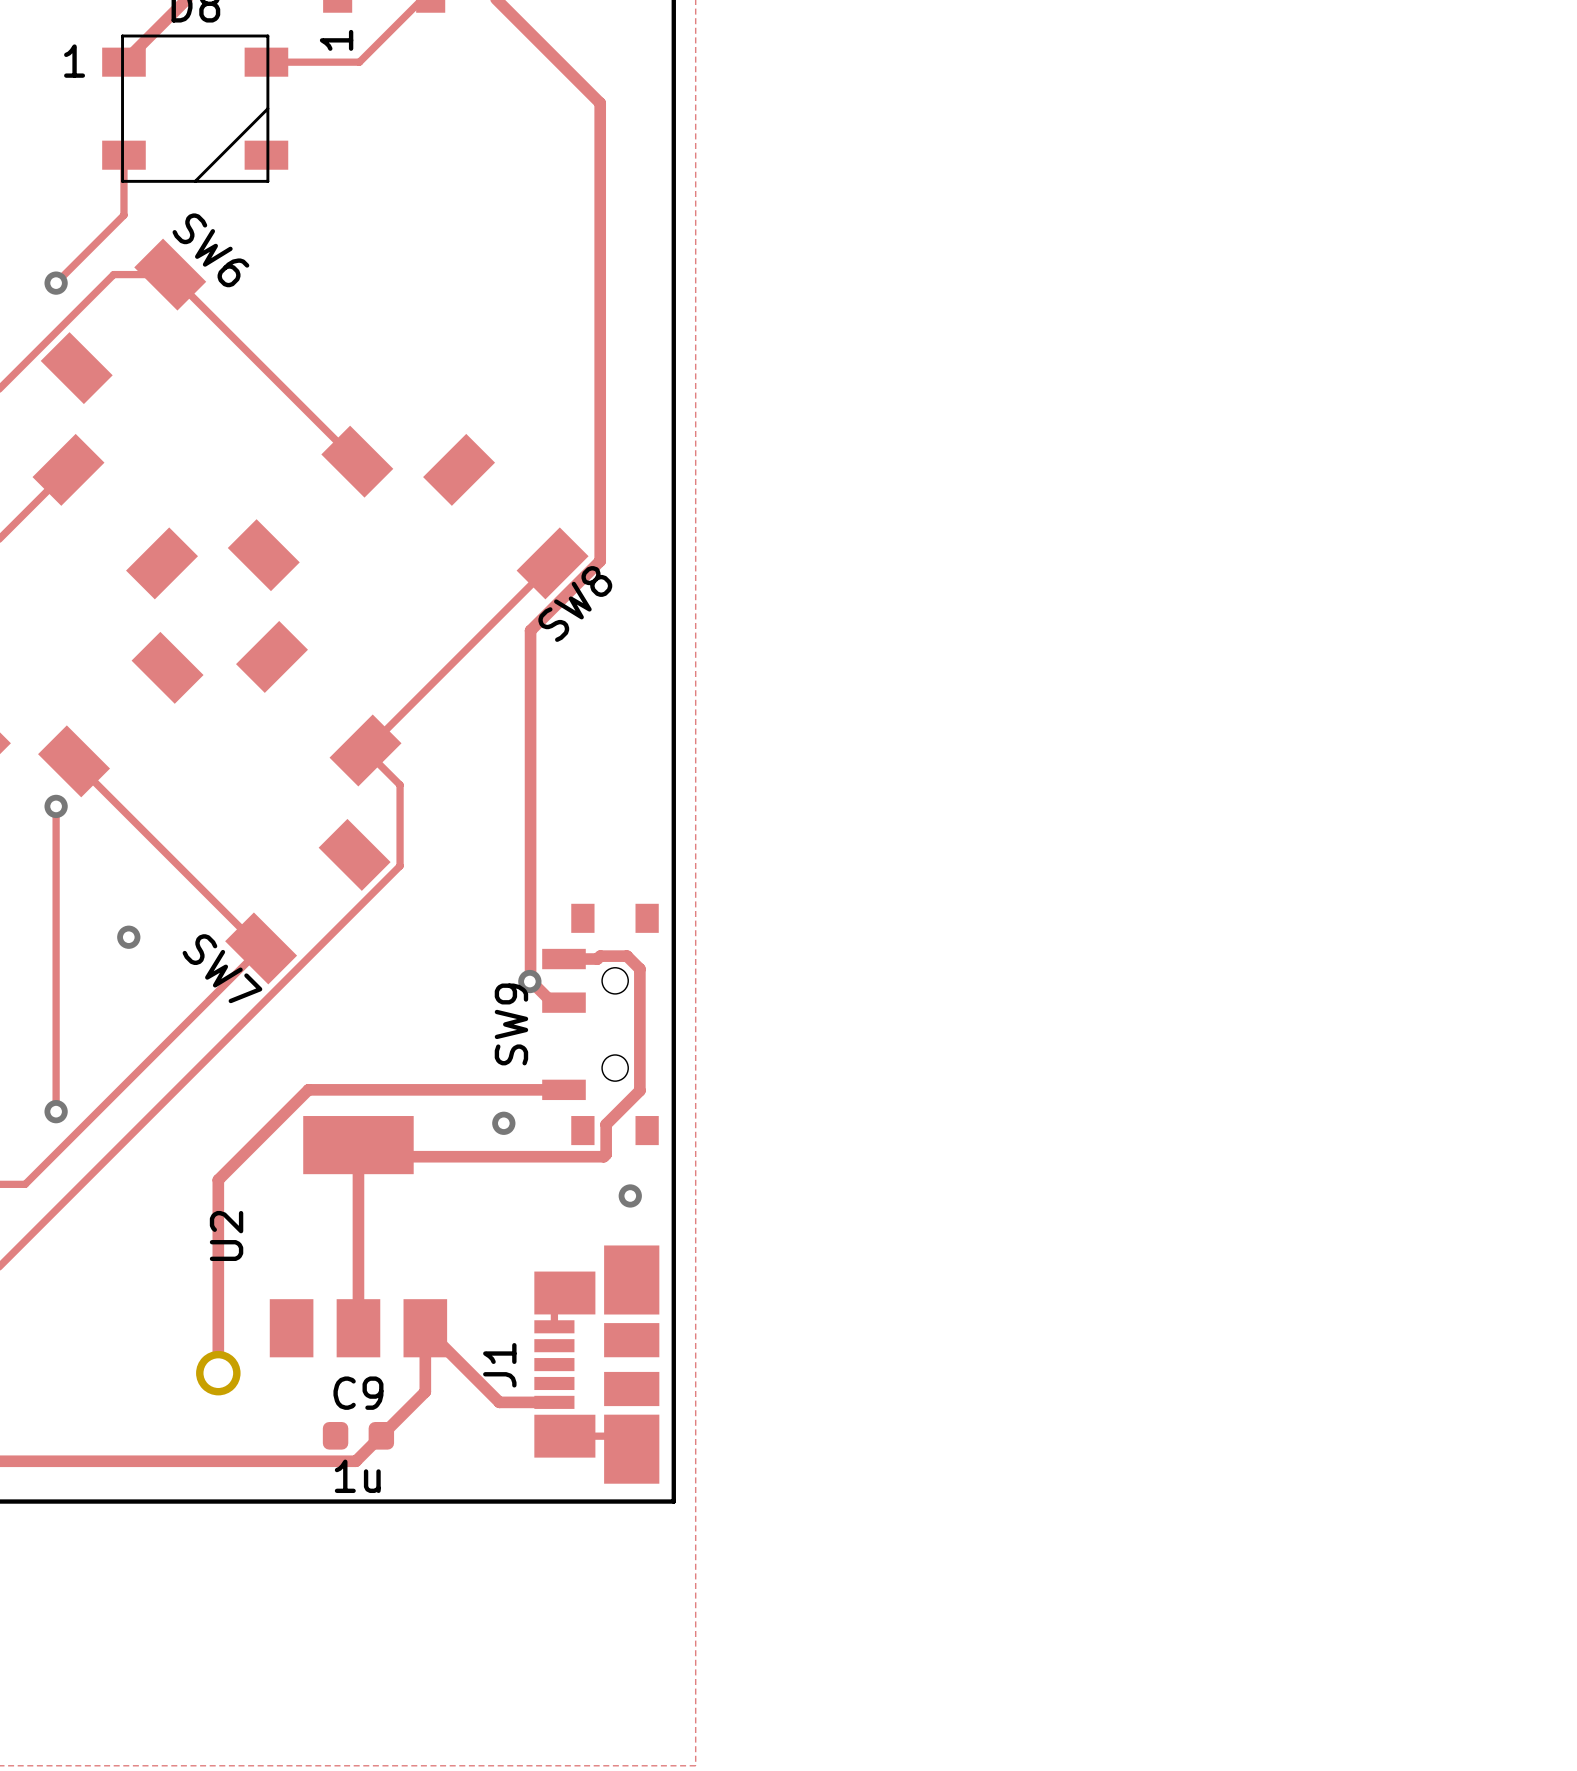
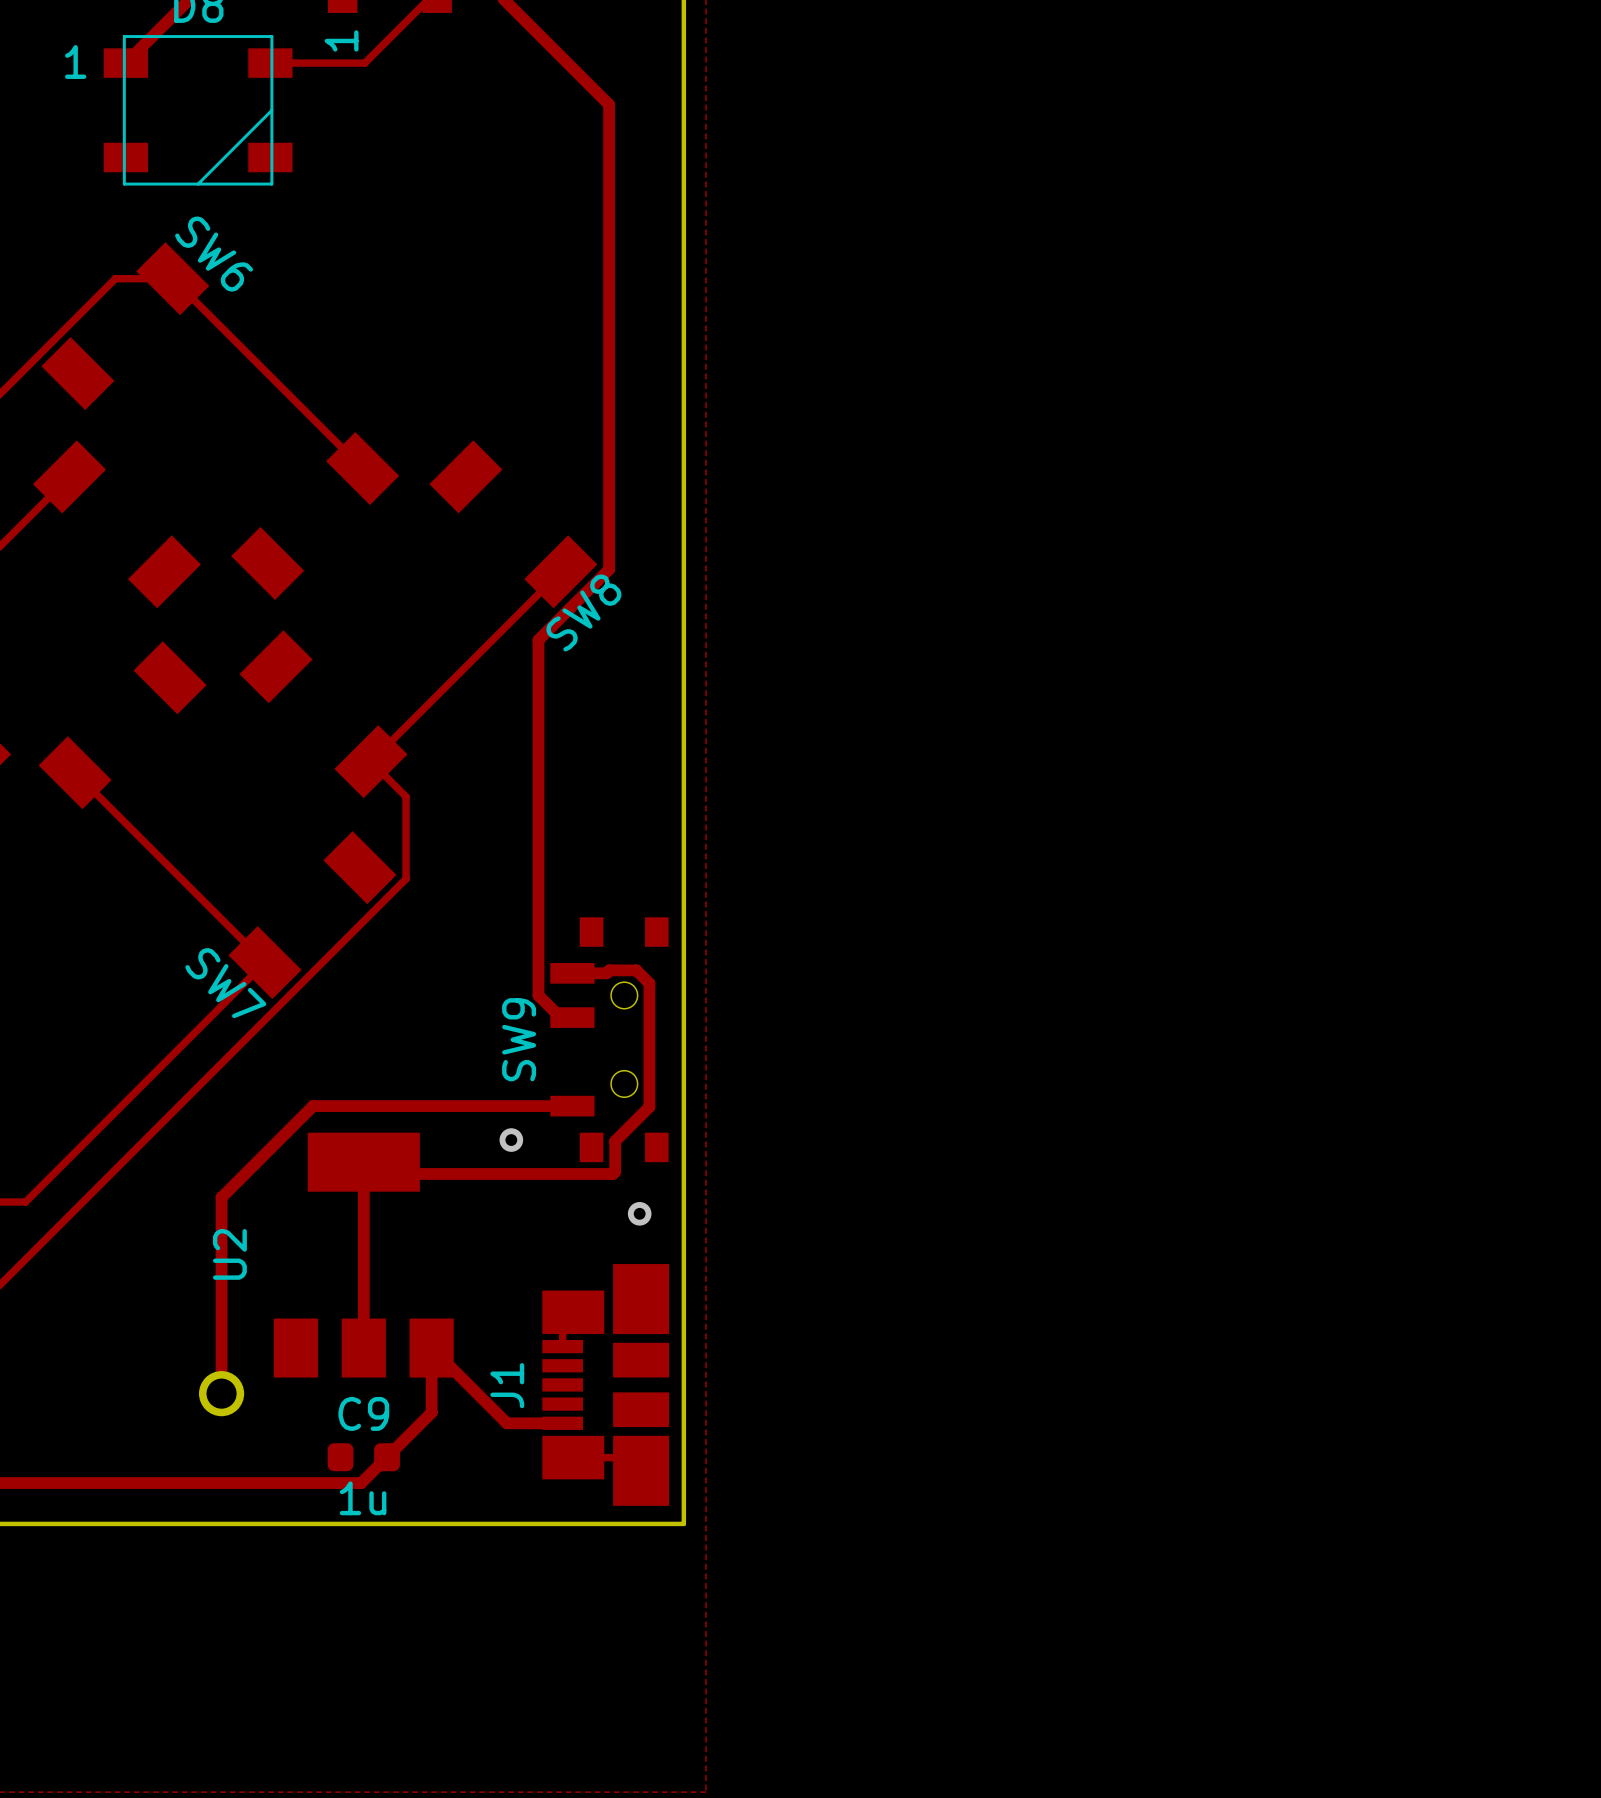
track: (123, 155) (123, 215) (56, 283) -> none
via: (56, 283) -> none
track: (56, 806) (56, 1111) -> none
via: (56, 806) -> none
via: (128, 937) -> none
via: (529, 981) -> none
via: (56, 1111) -> none

